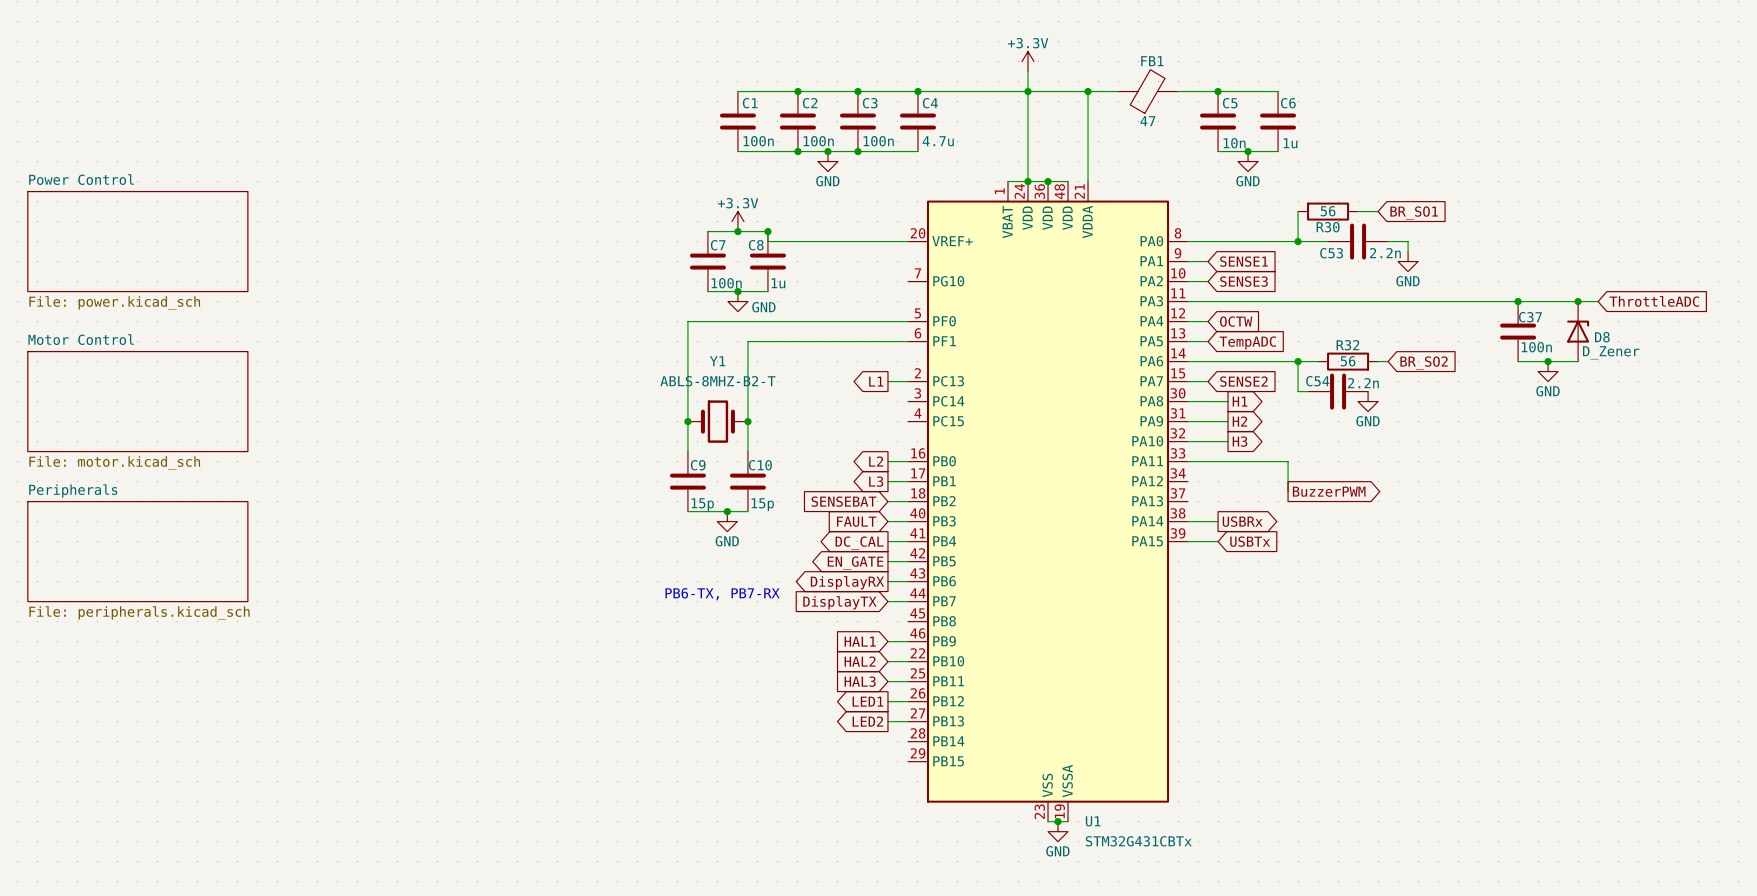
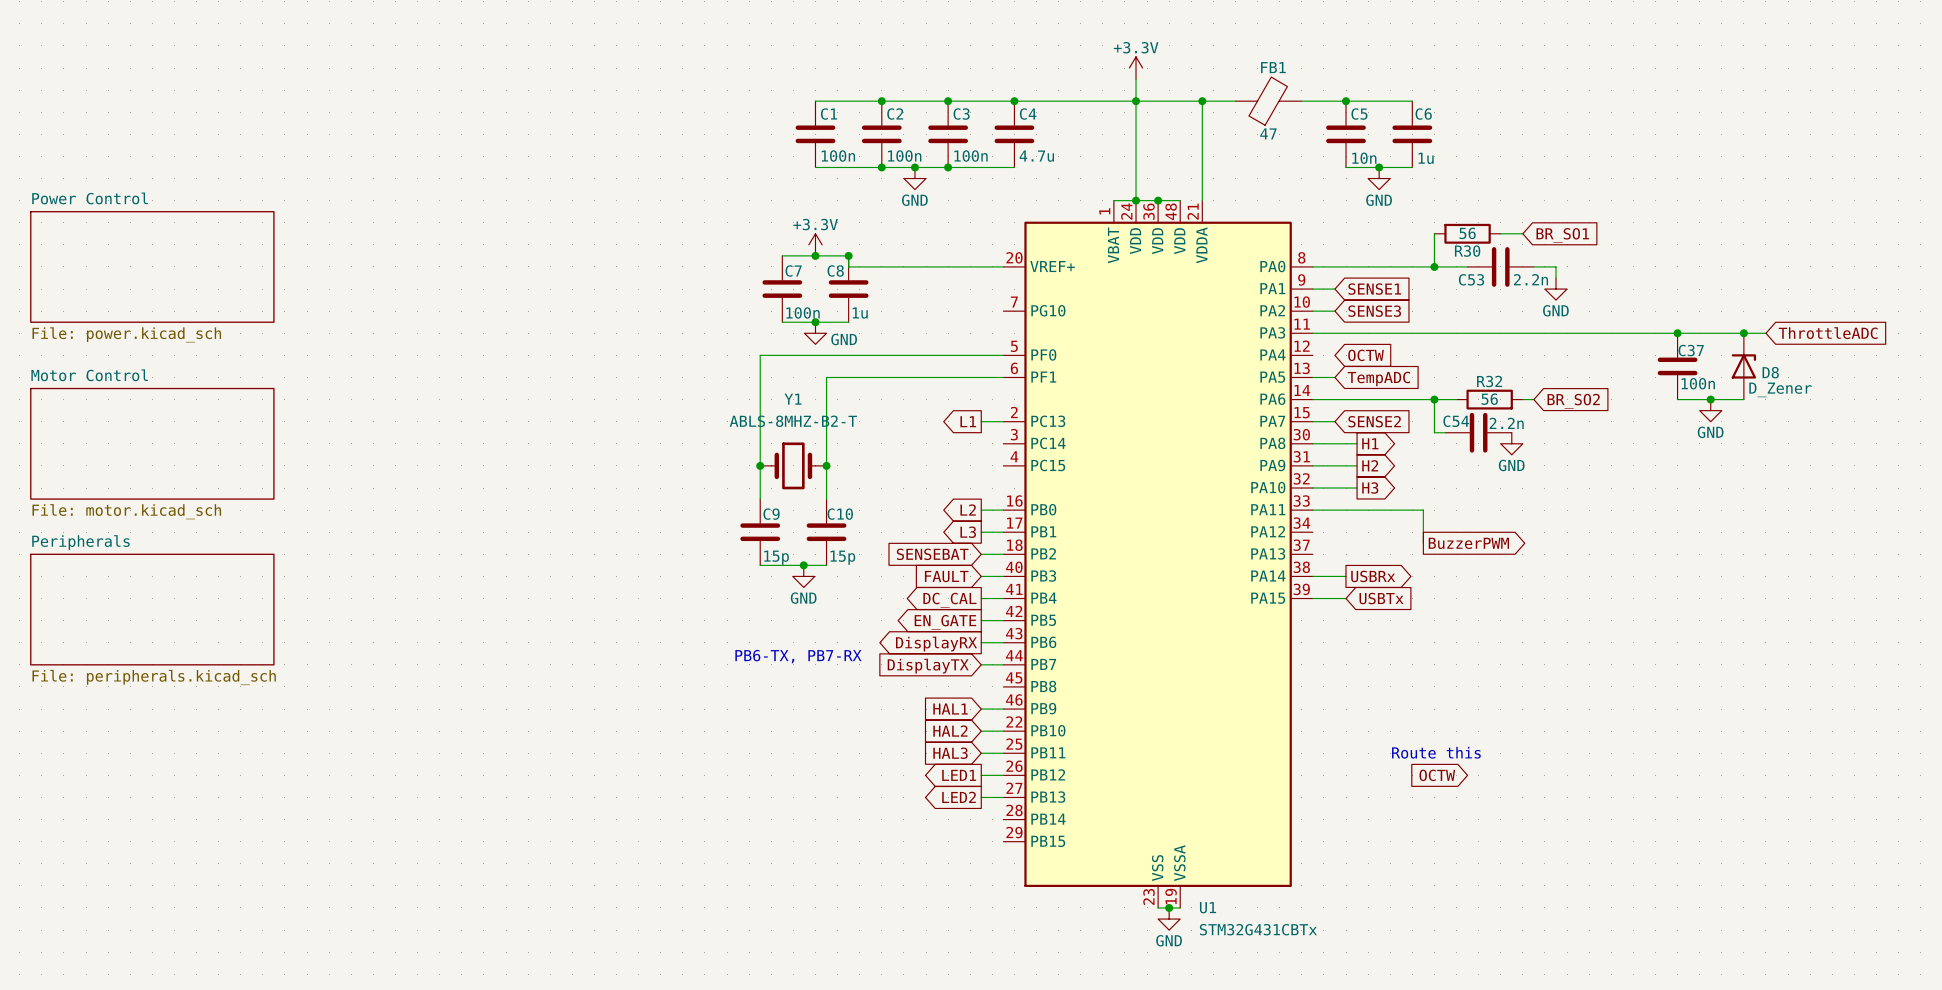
wire: (1188, 321) (1208, 321) -> none
text: none -> Route this (1436, 752)
global label: none -> OCTW (1437, 775)

